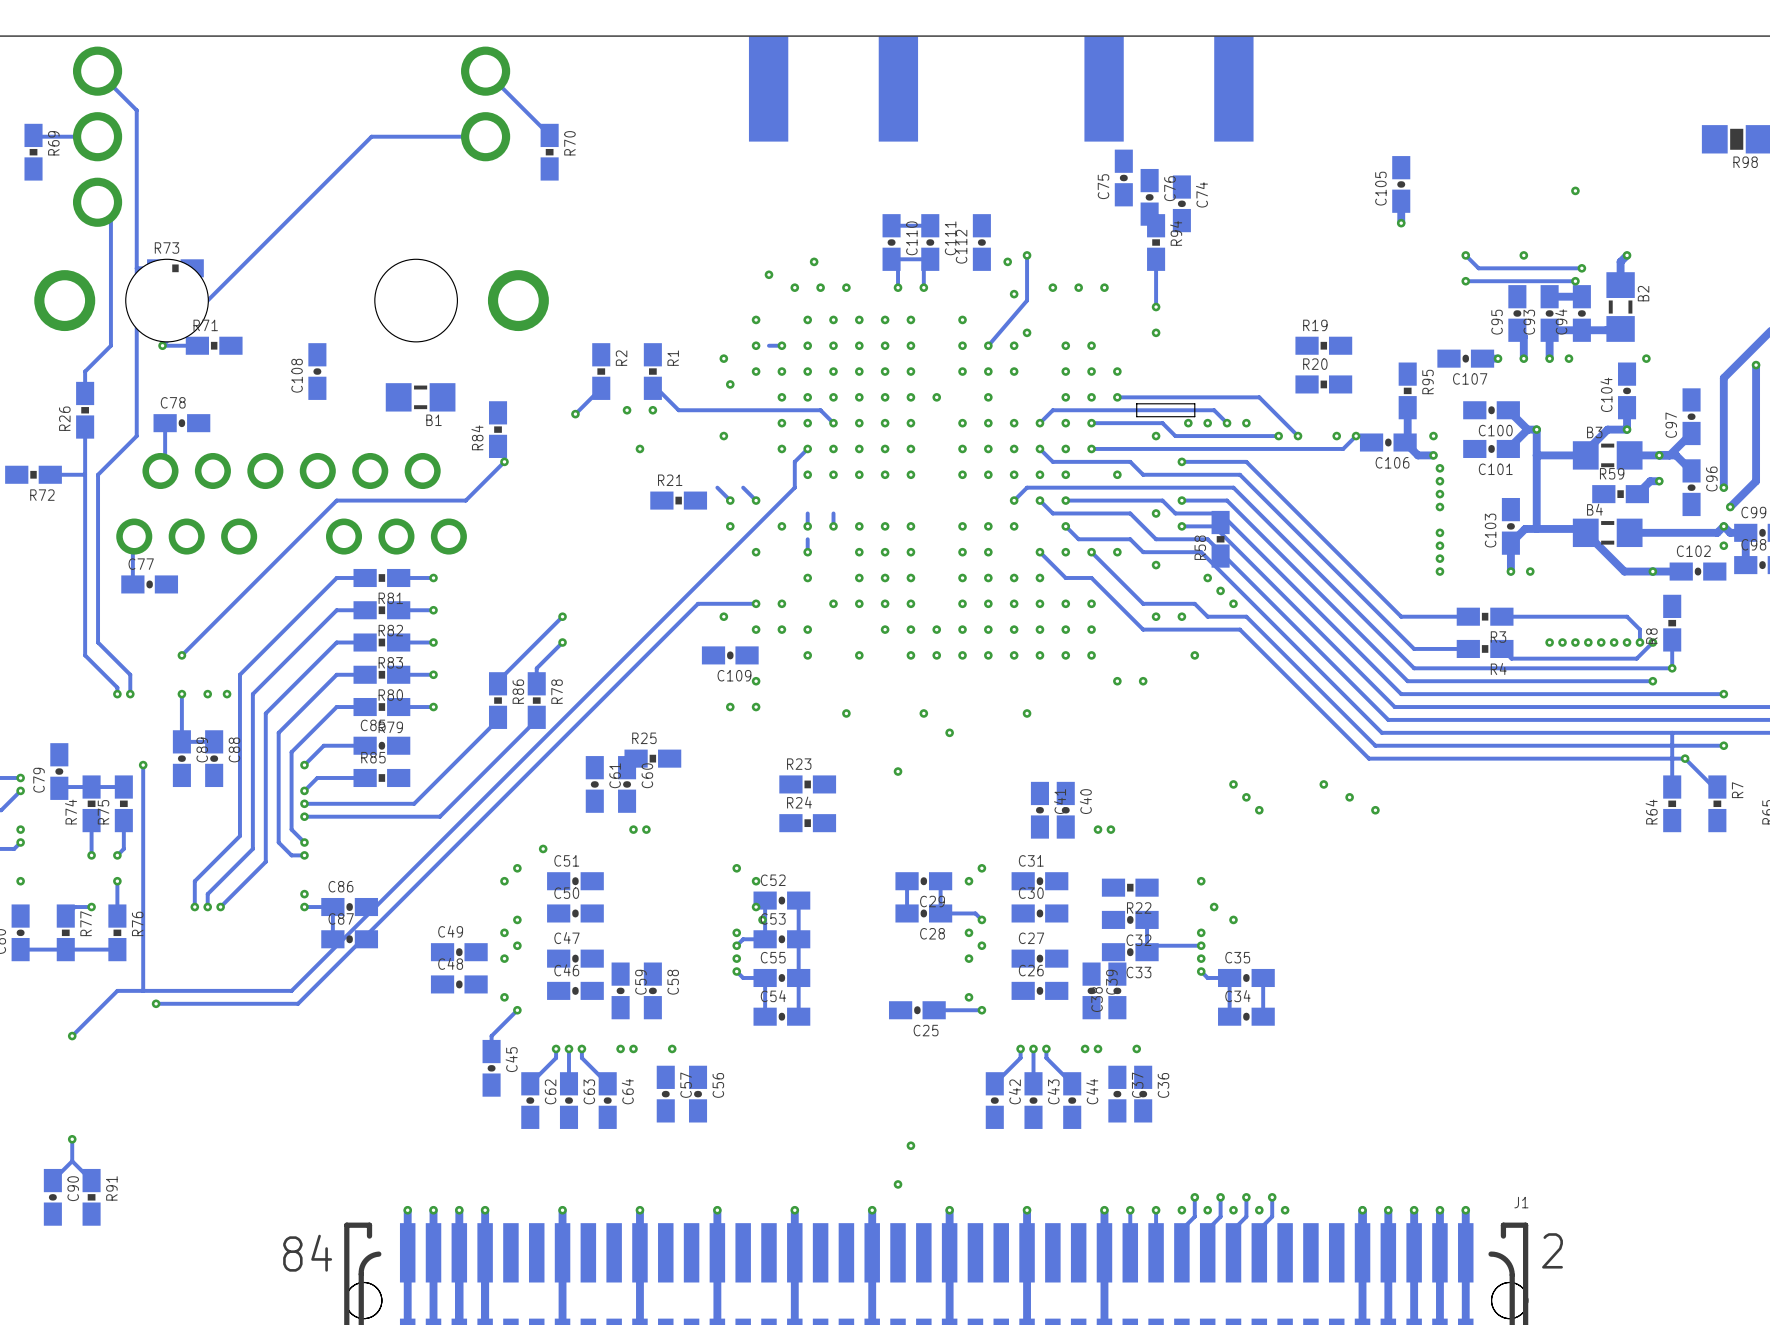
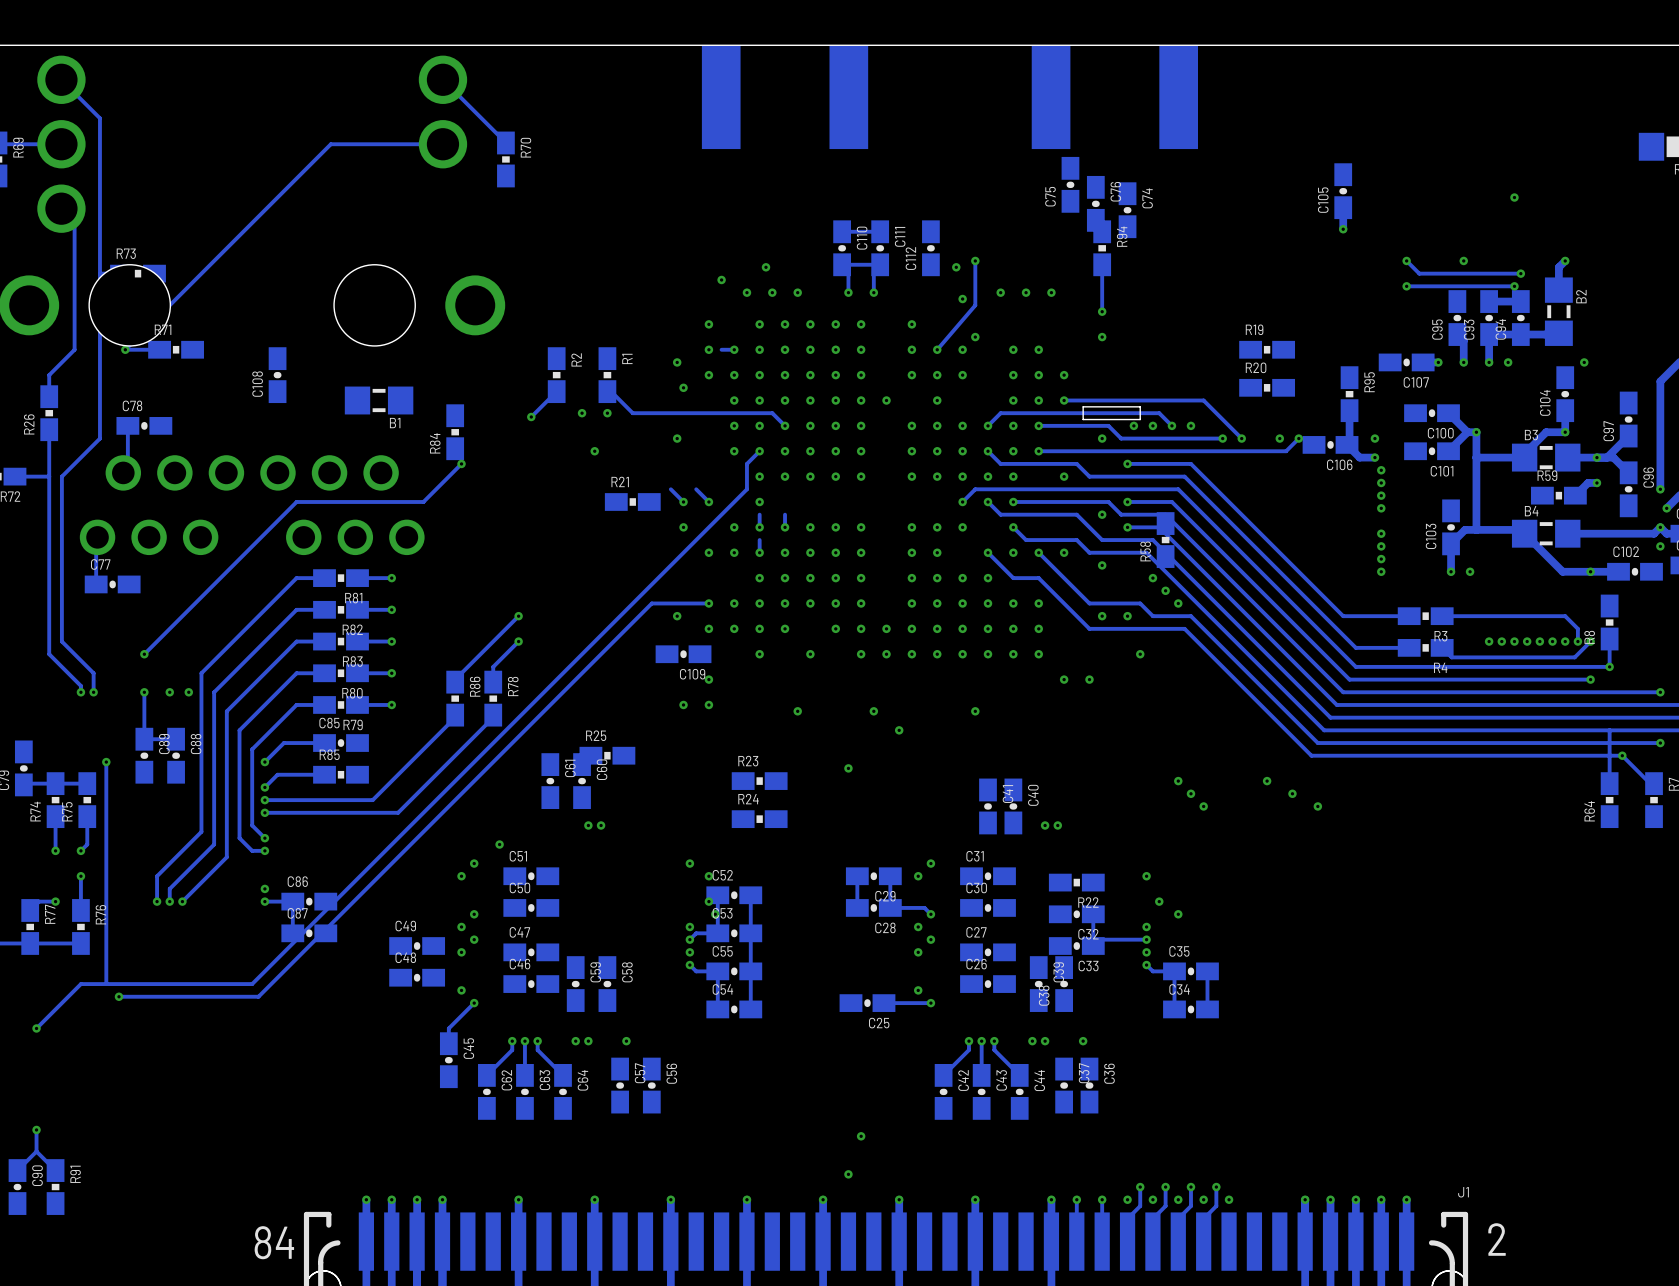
via: none -> (759, 501)
via: none -> (734, 552)
via: none -> (785, 552)
via: none -> (785, 578)
via: none -> (759, 603)
via: none -> (785, 628)

